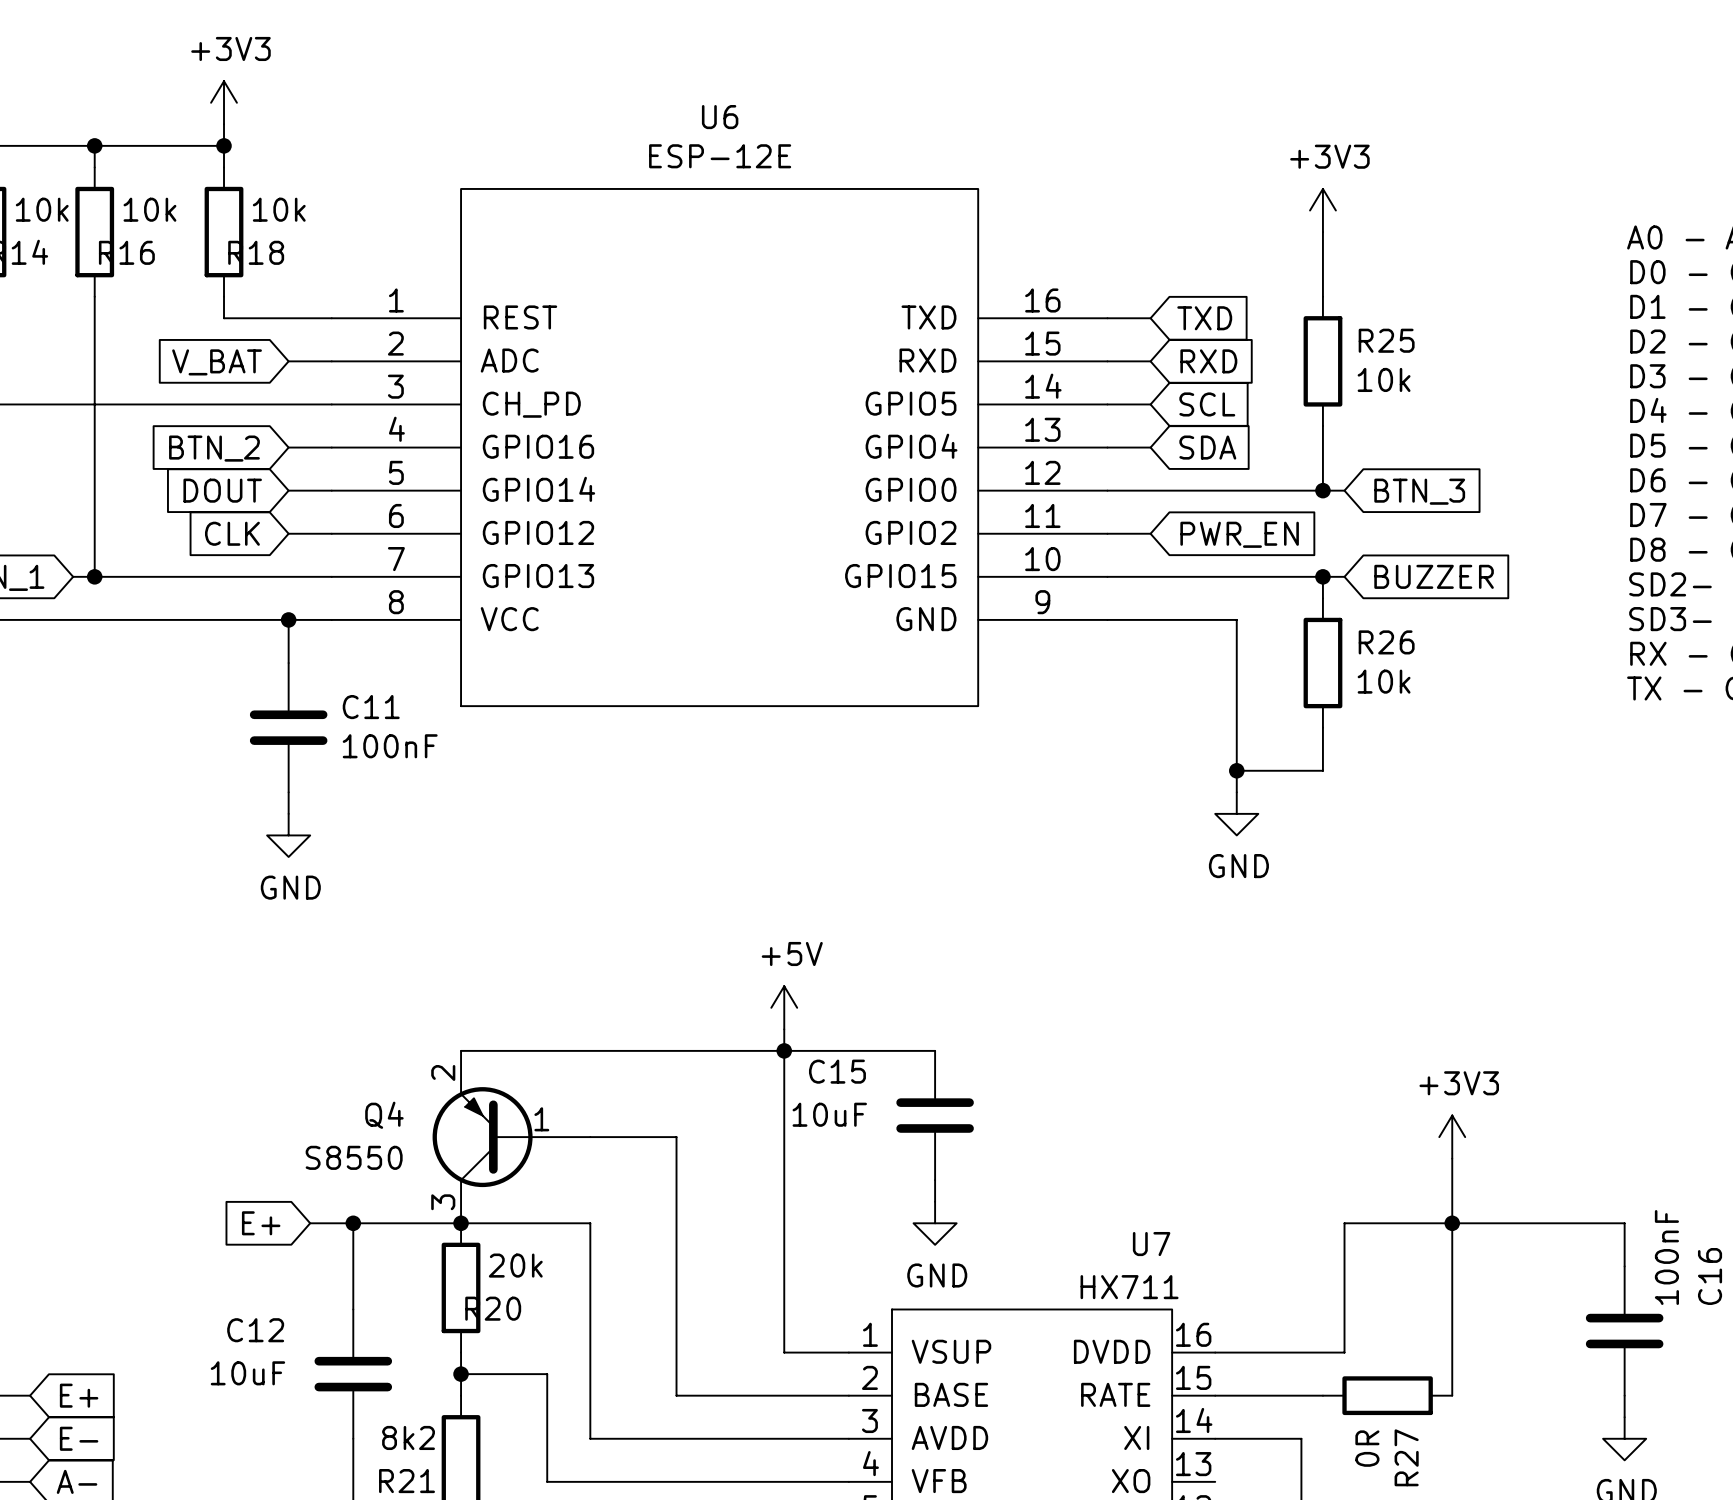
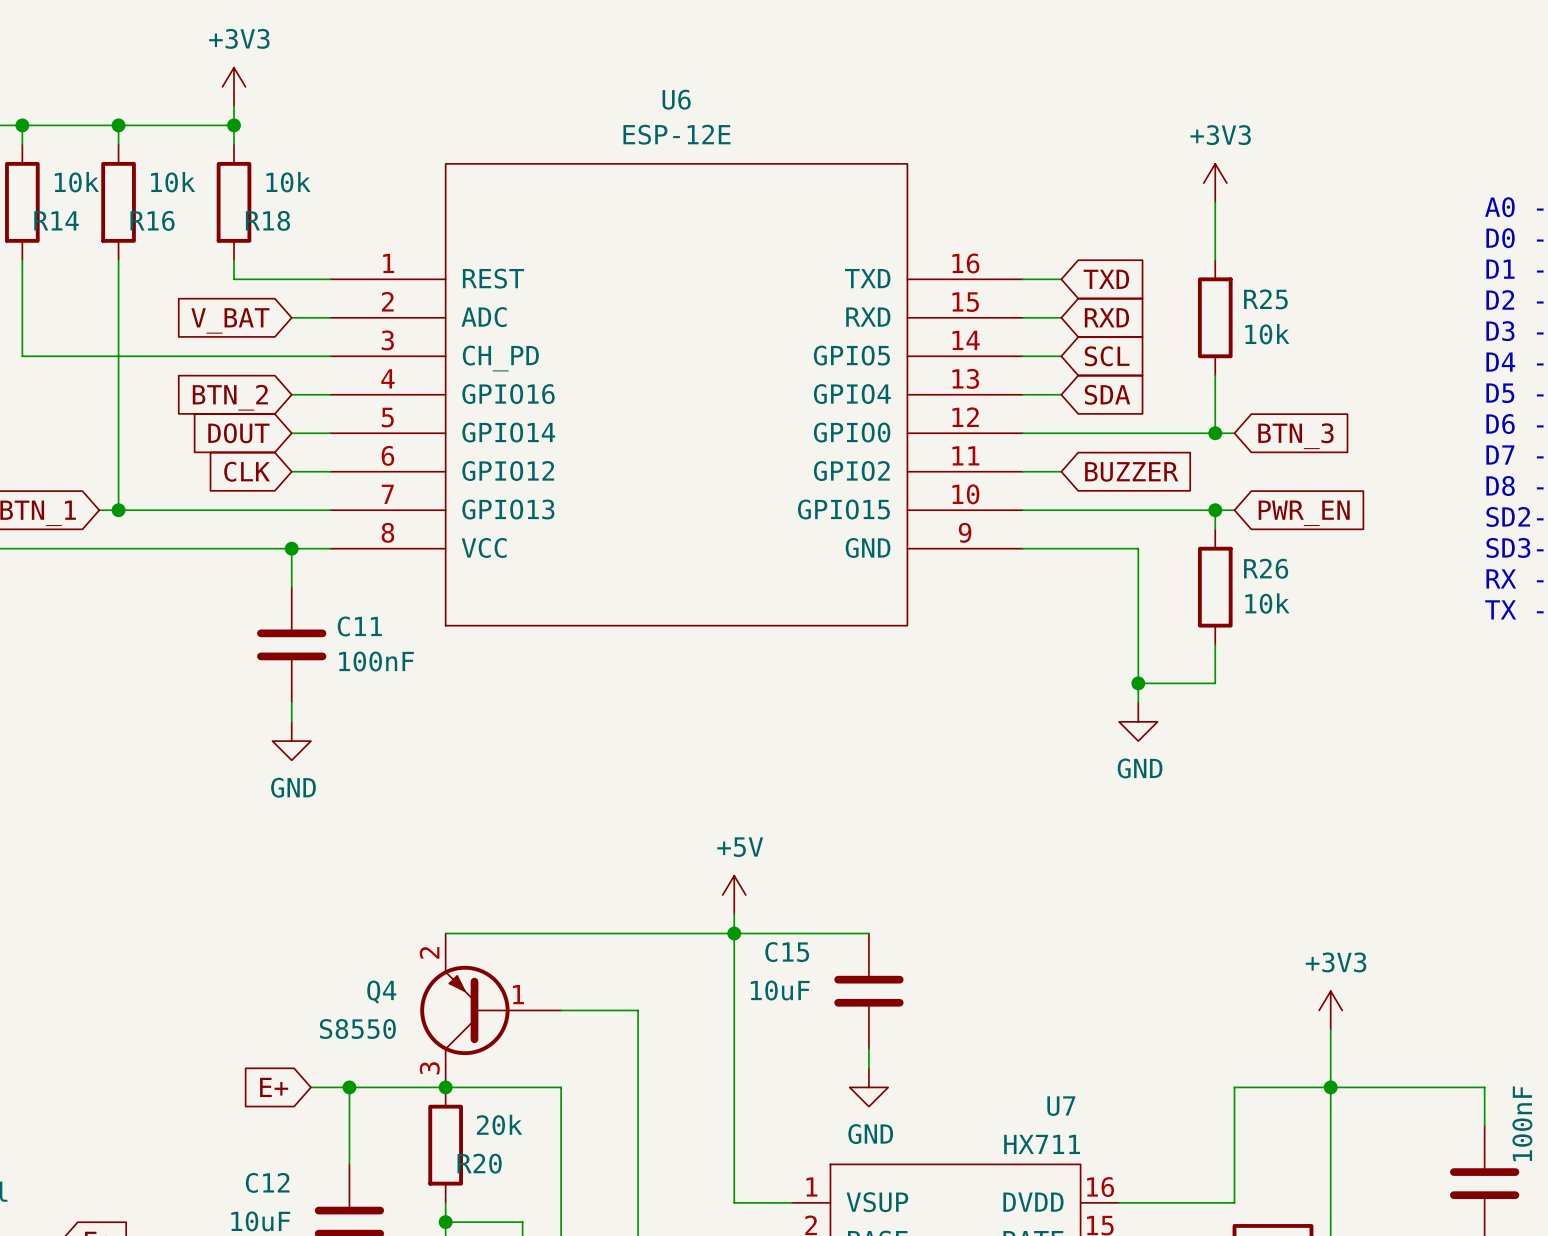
global label: PWR_EN (1239, 534) -> BUZZER (1131, 471)
global label: BUZZER (1434, 576) -> PWR_EN (1304, 513)

